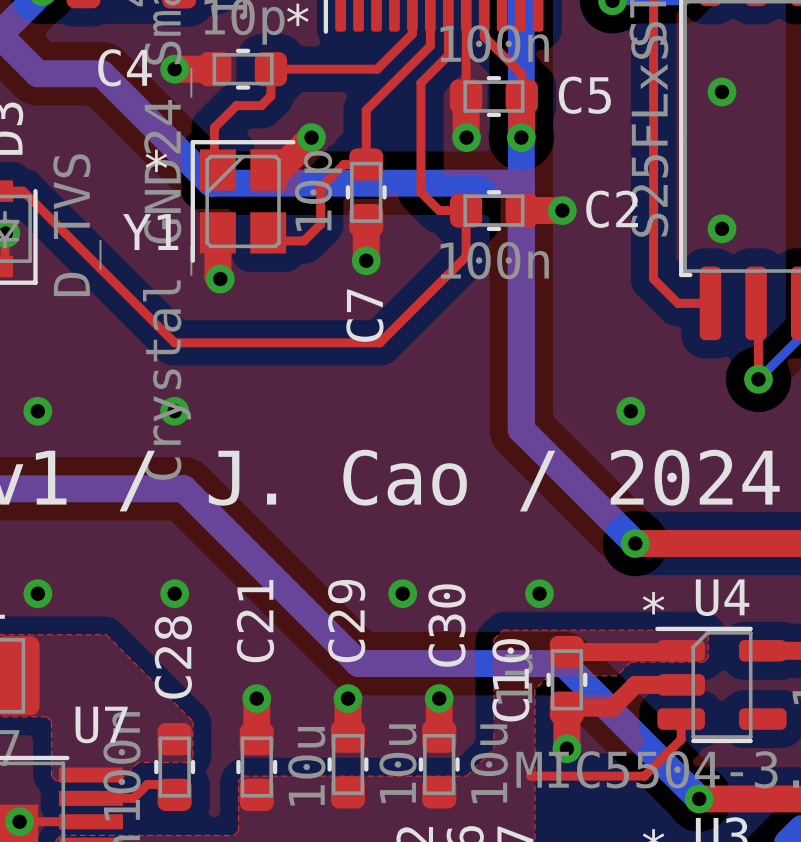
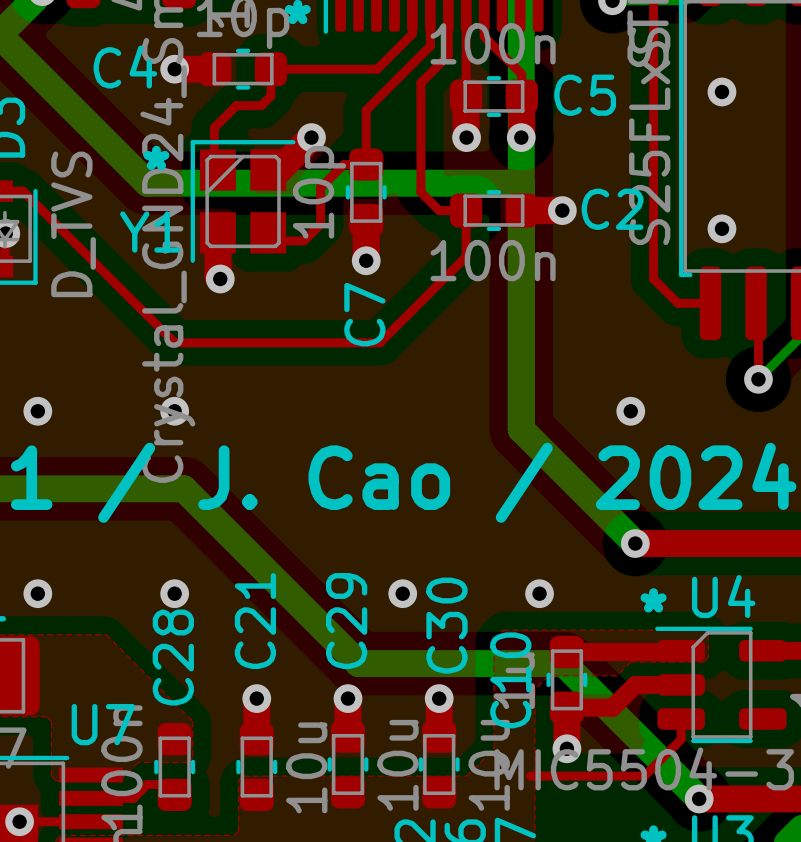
bottom track: (37, 73) (101, 73) (211, 183) -> (37, 73) (147, 183) (211, 183)

